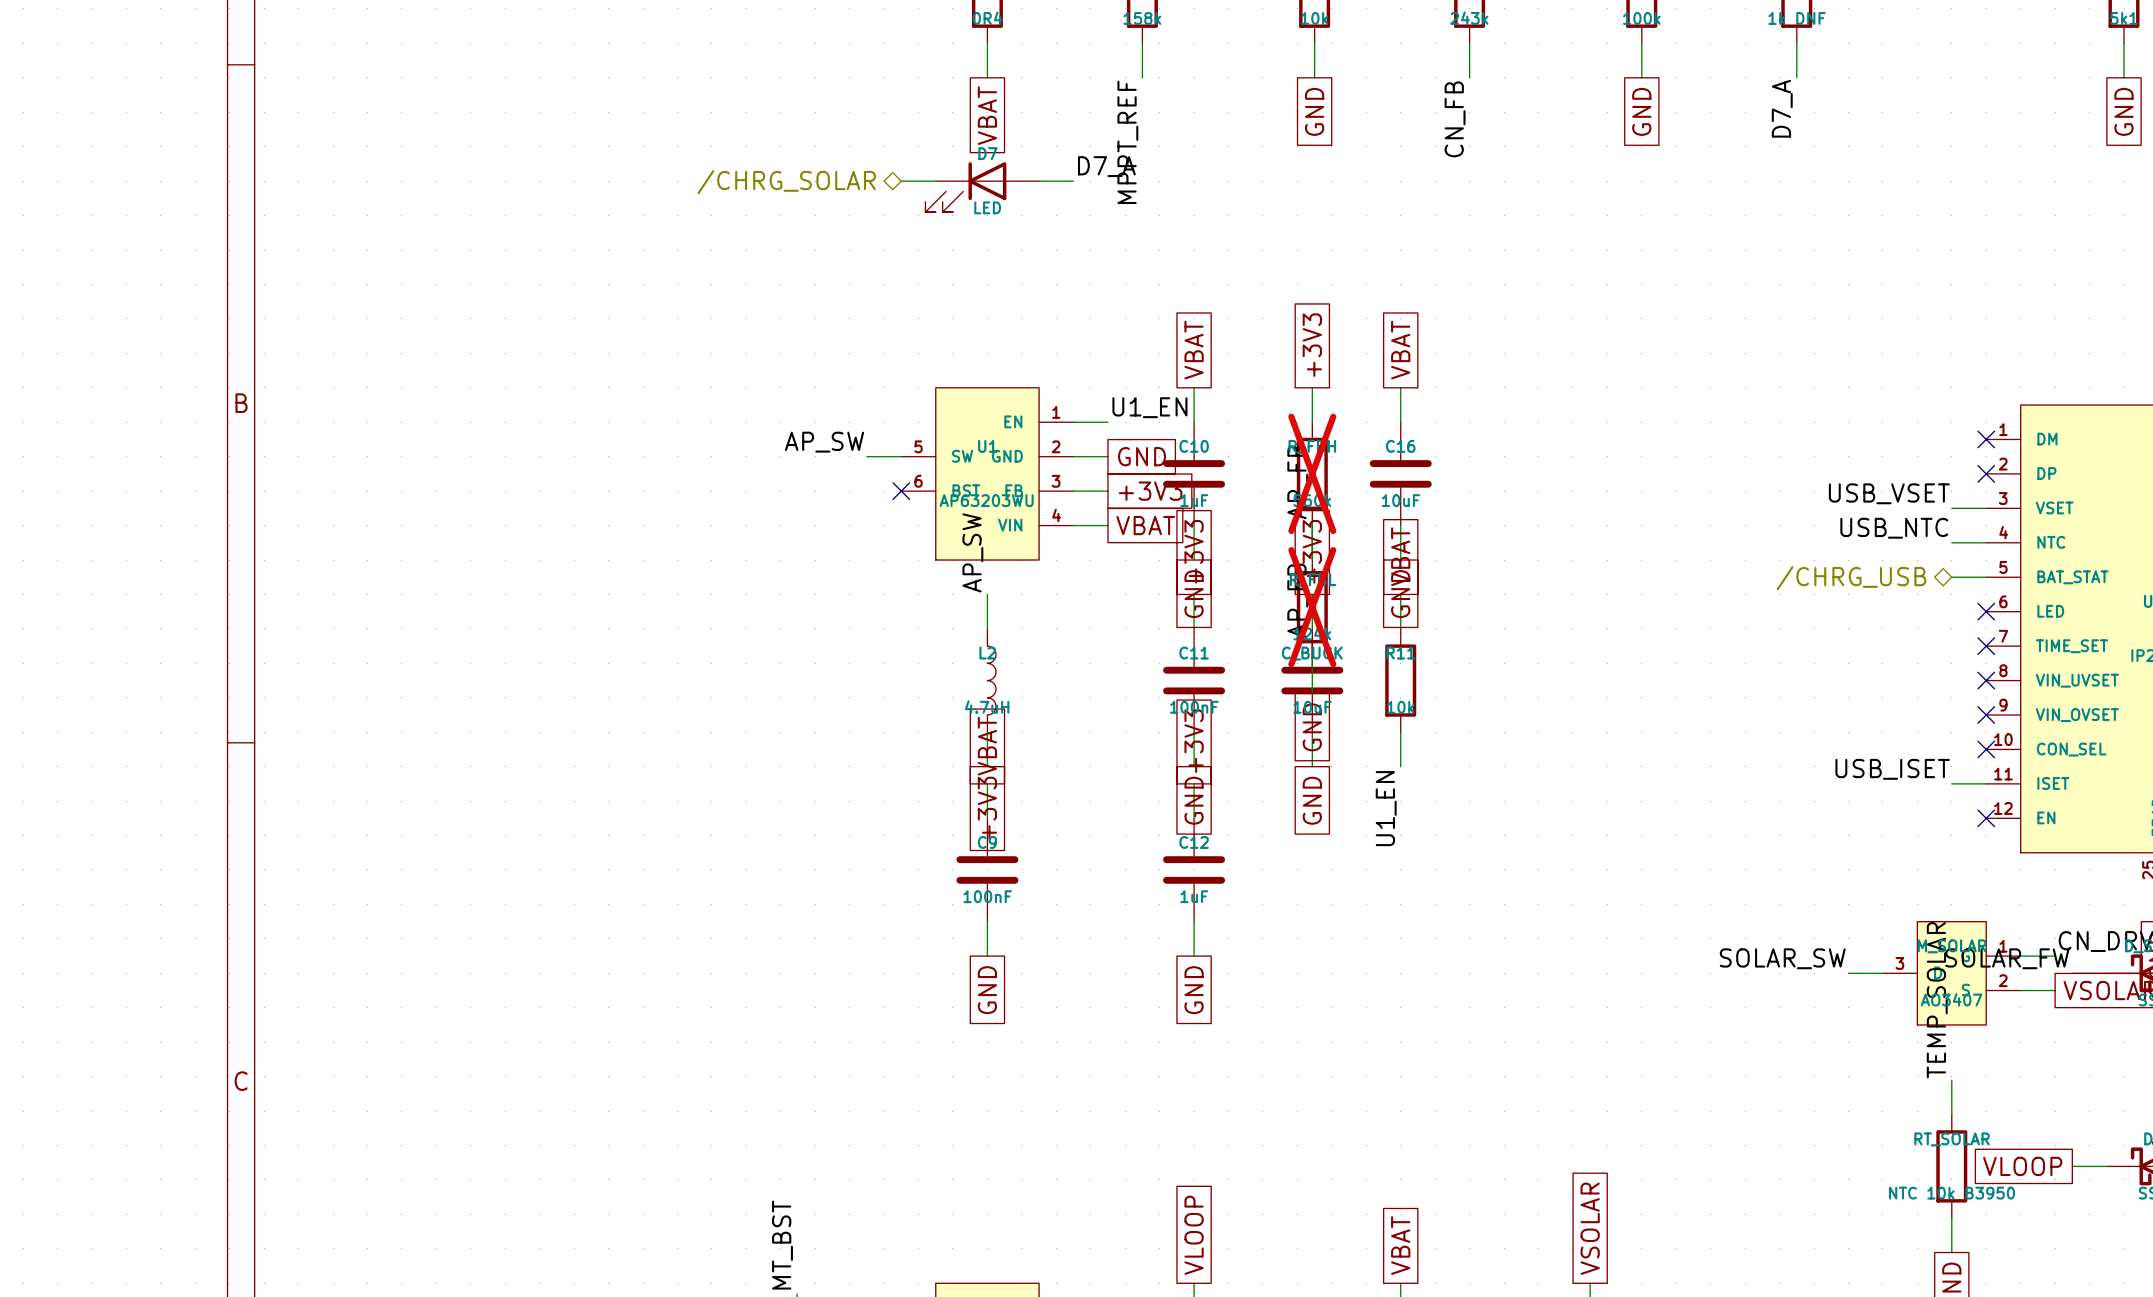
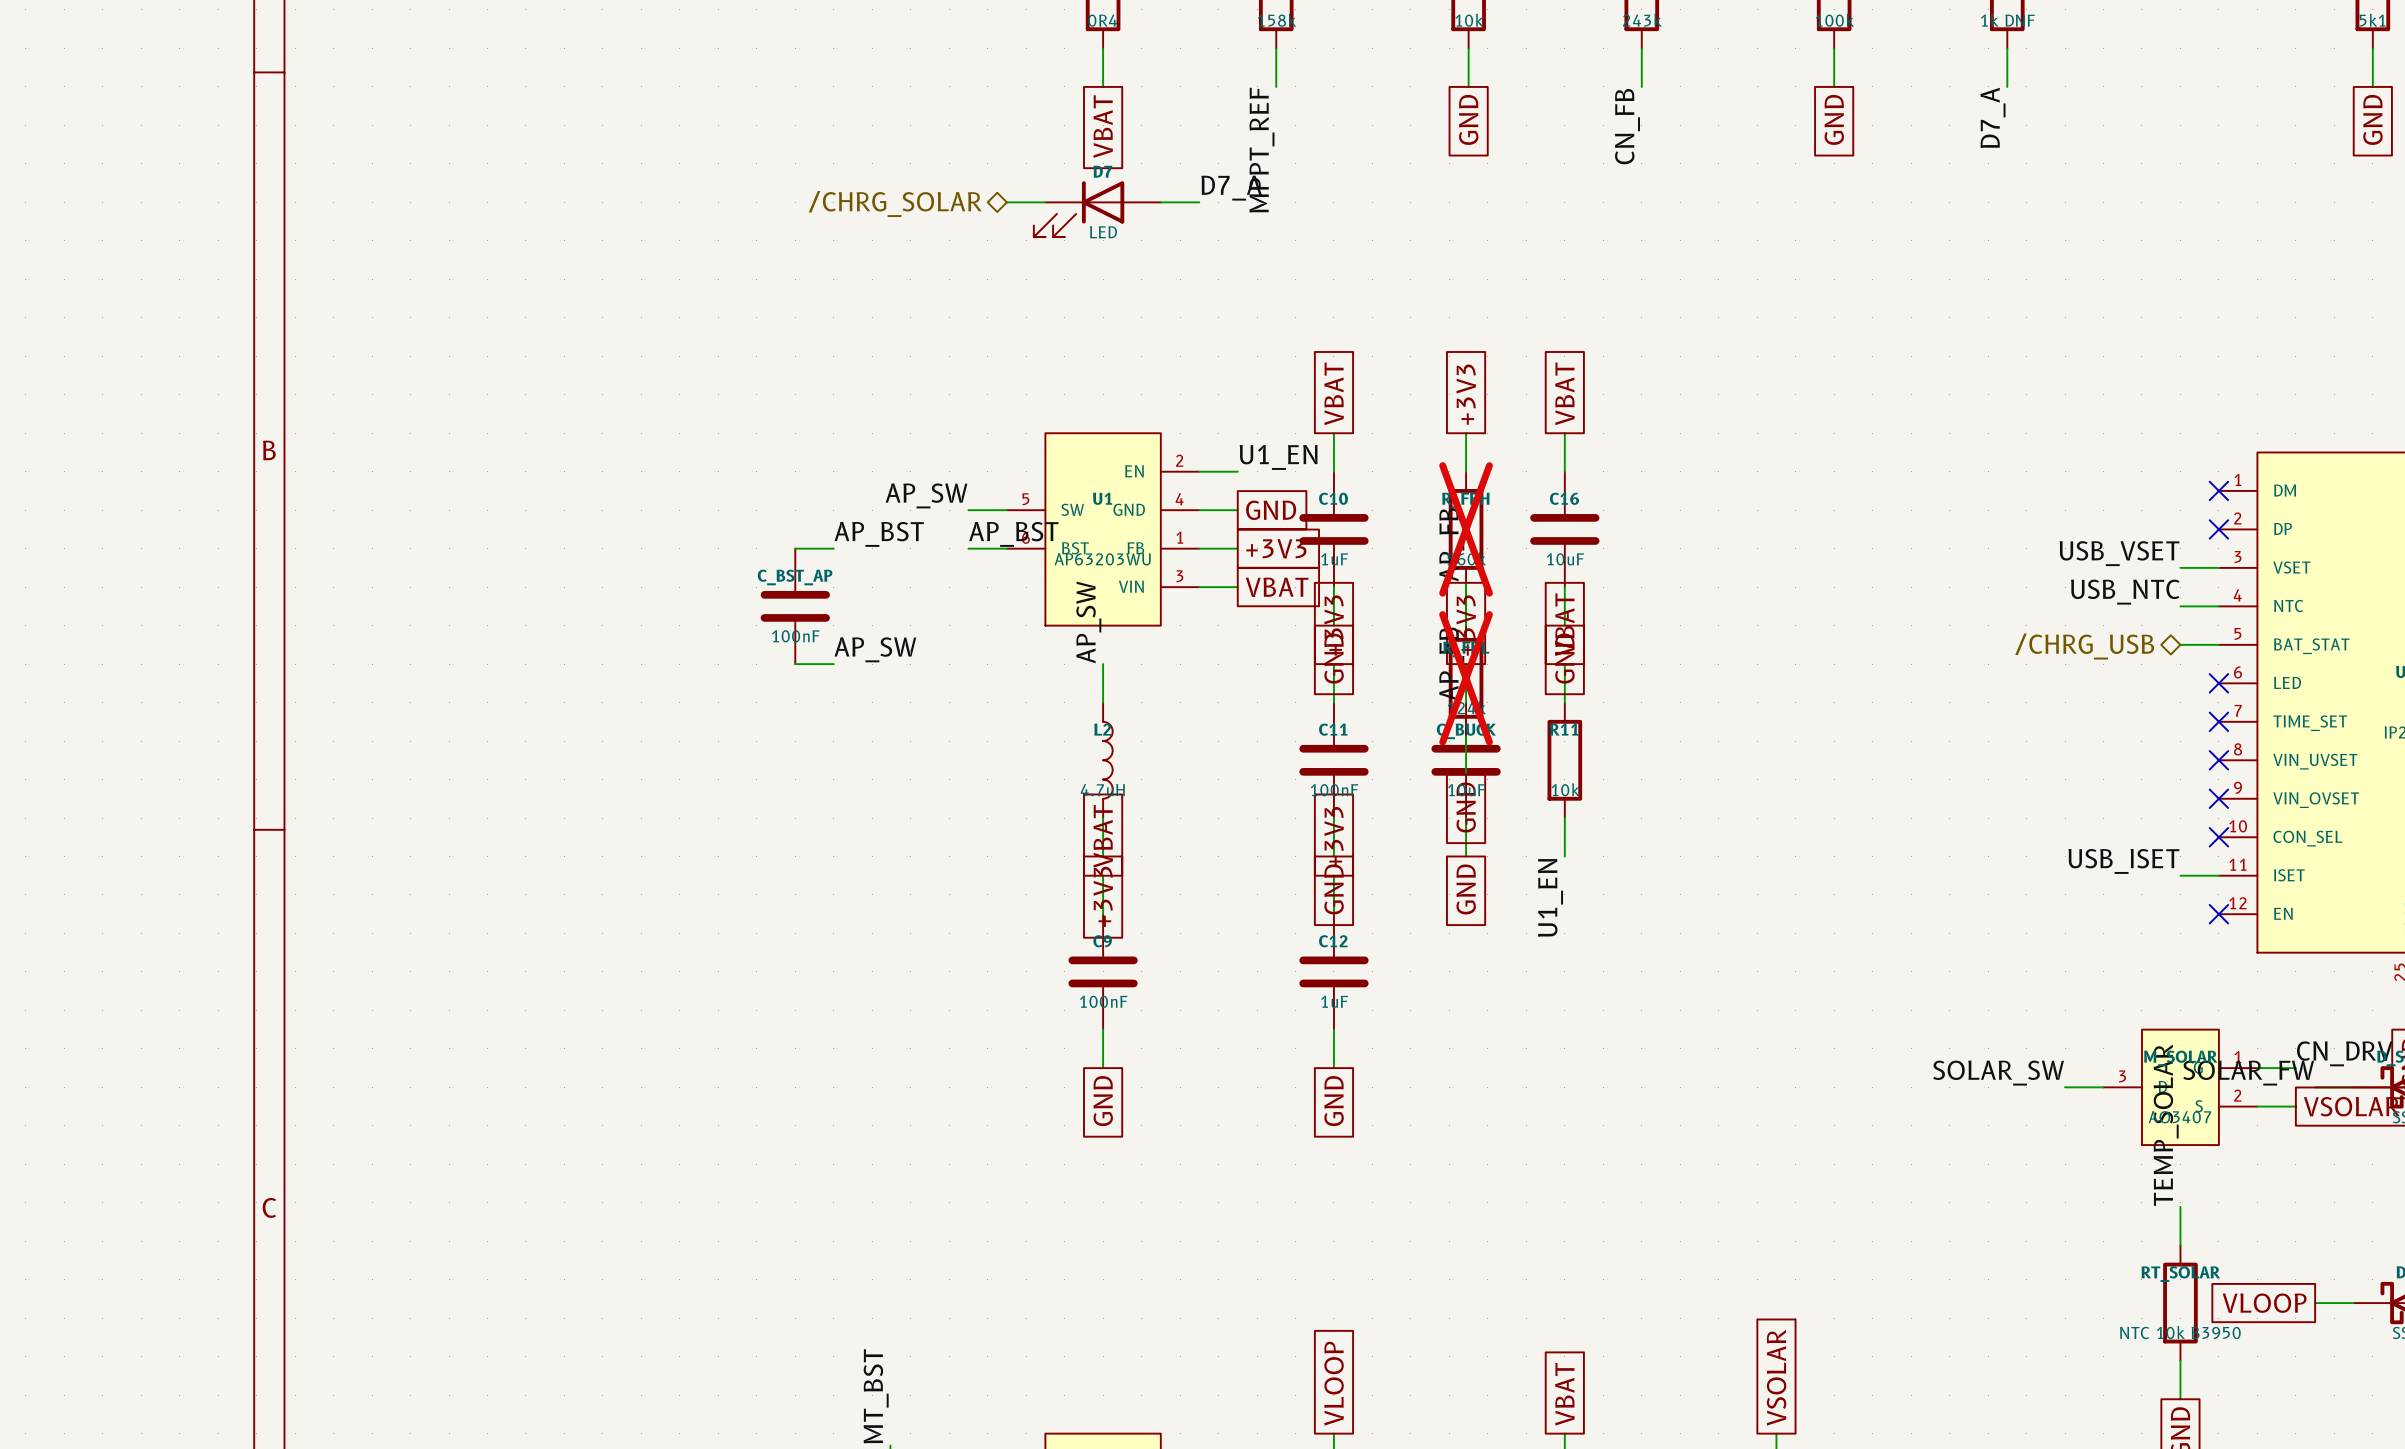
U1 pin number: 1 (1056, 412) -> 2 (1179, 460)
U1 pin number: 2 (1056, 446) -> 4 (1179, 499)
label: none -> AP_BST (879, 534)
label: none -> AP_BST (1013, 534)
U1 pin number: 3 (1056, 481) -> 1 (1179, 537)
wire: none -> (795, 548) (833, 548)
wire: none -> (968, 548) (1006, 548)
no-connect mark: (901, 491) -> none
U1 pin number: 4 (1056, 515) -> 3 (1179, 576)
C_BST_AP: none -> 100nF (795, 606)
label: none -> AP_SW (875, 649)
wire: none -> (795, 664) (833, 664)

